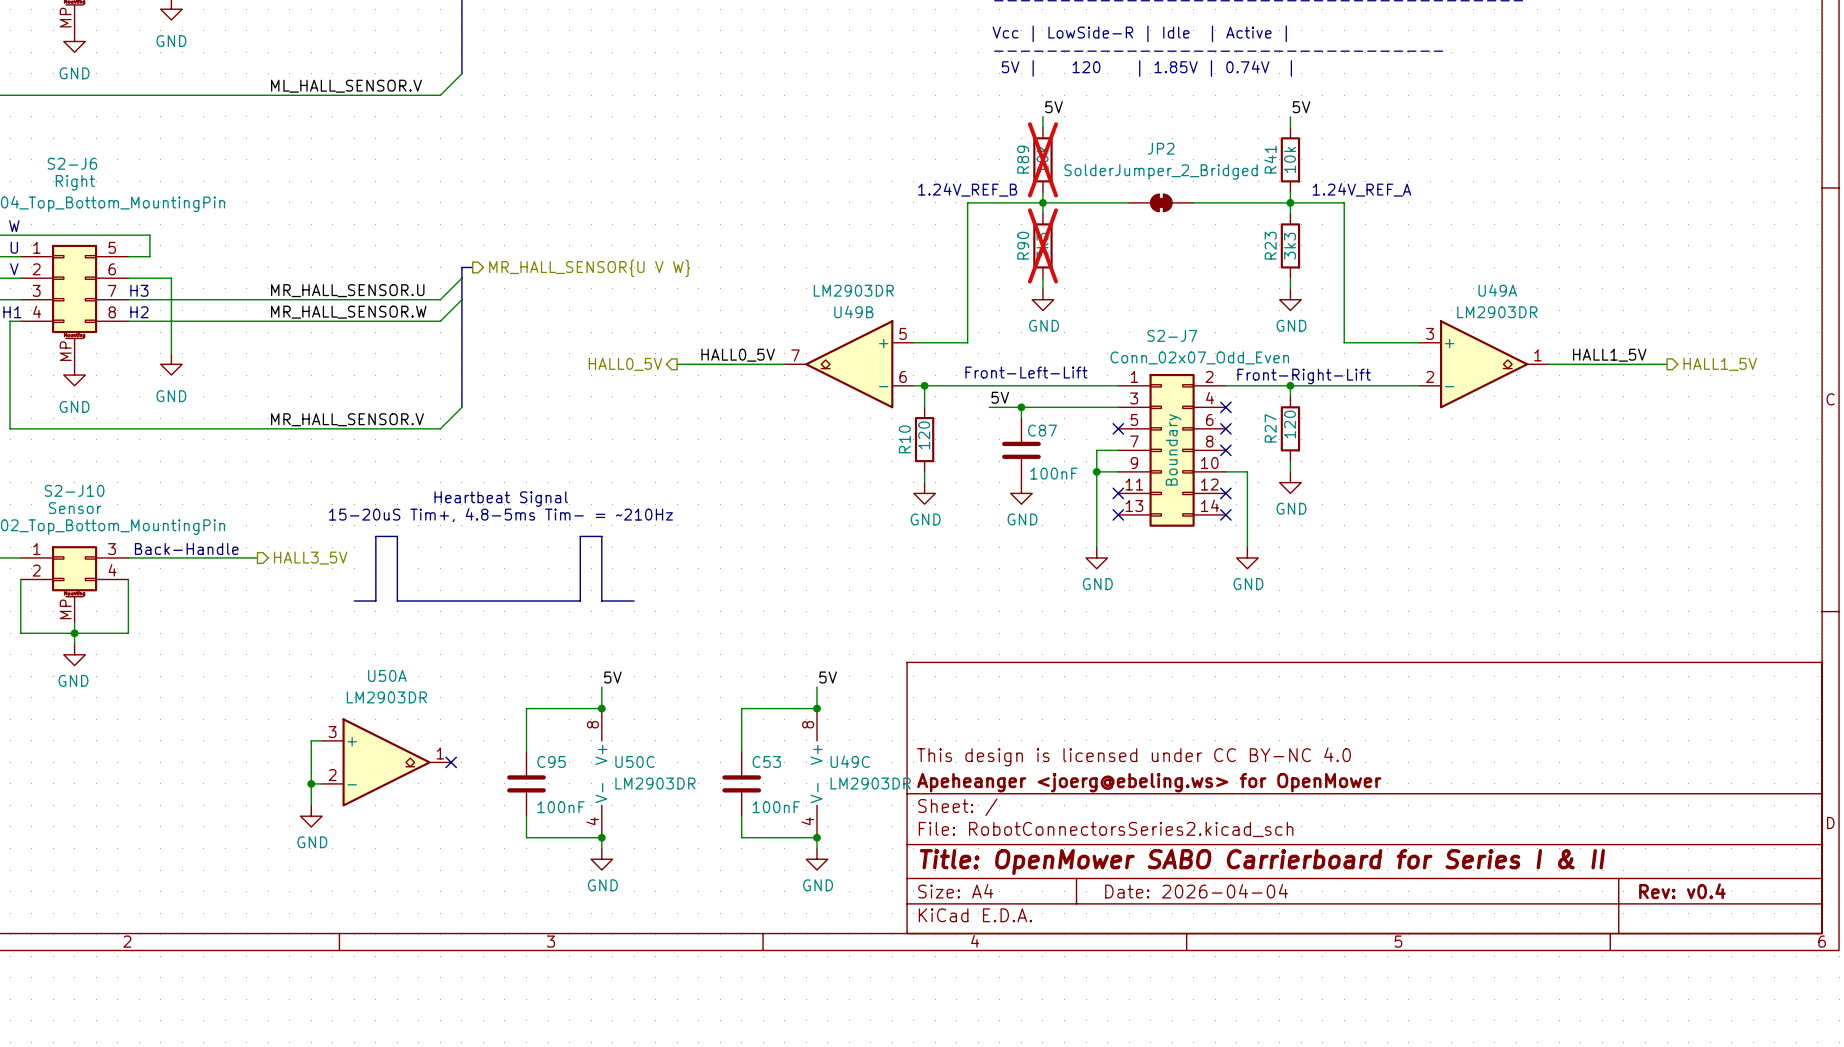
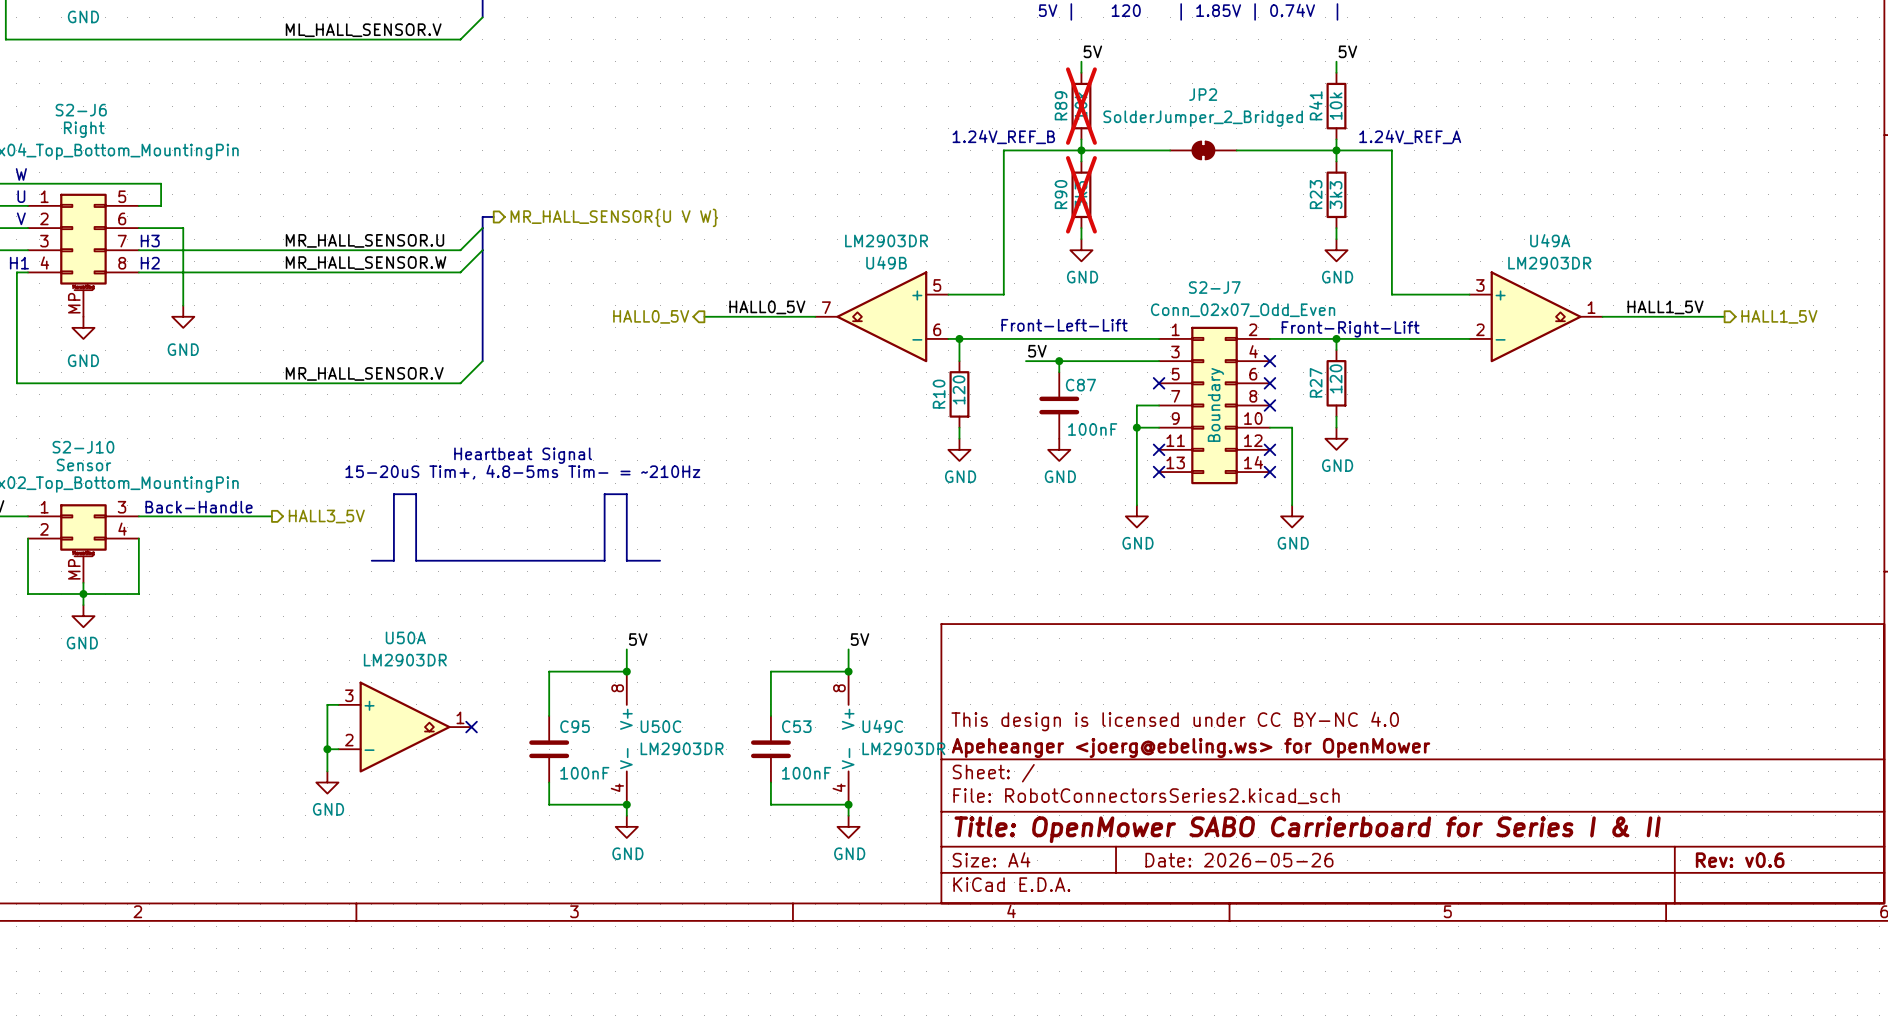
title block: Date: 2026-04-04 (1196, 891) -> Date: 2026-05-26 (1239, 860)
title block: Rev: v0.4 (1682, 891) -> Rev: v0.6 (1740, 860)

